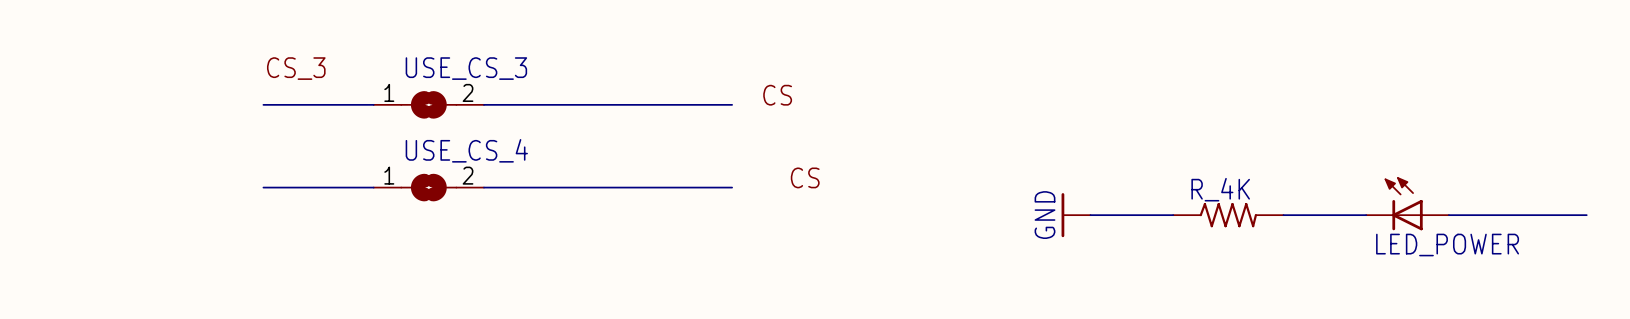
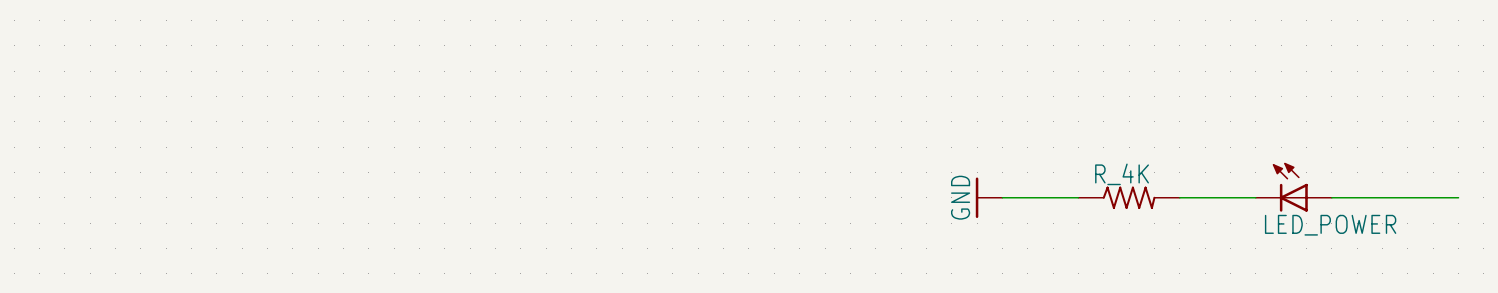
label: CS_3 (296, 68) -> none
label: CS (777, 95) -> none
wire: (263, 104) (373, 104) -> none
USE_CS_3: (428, 104) -> none
wire: (483, 104) (732, 104) -> none
label: CS (805, 177) -> none
wire: (263, 187) (373, 187) -> none
USE_CS_4: (428, 187) -> none
wire: (483, 187) (732, 187) -> none

